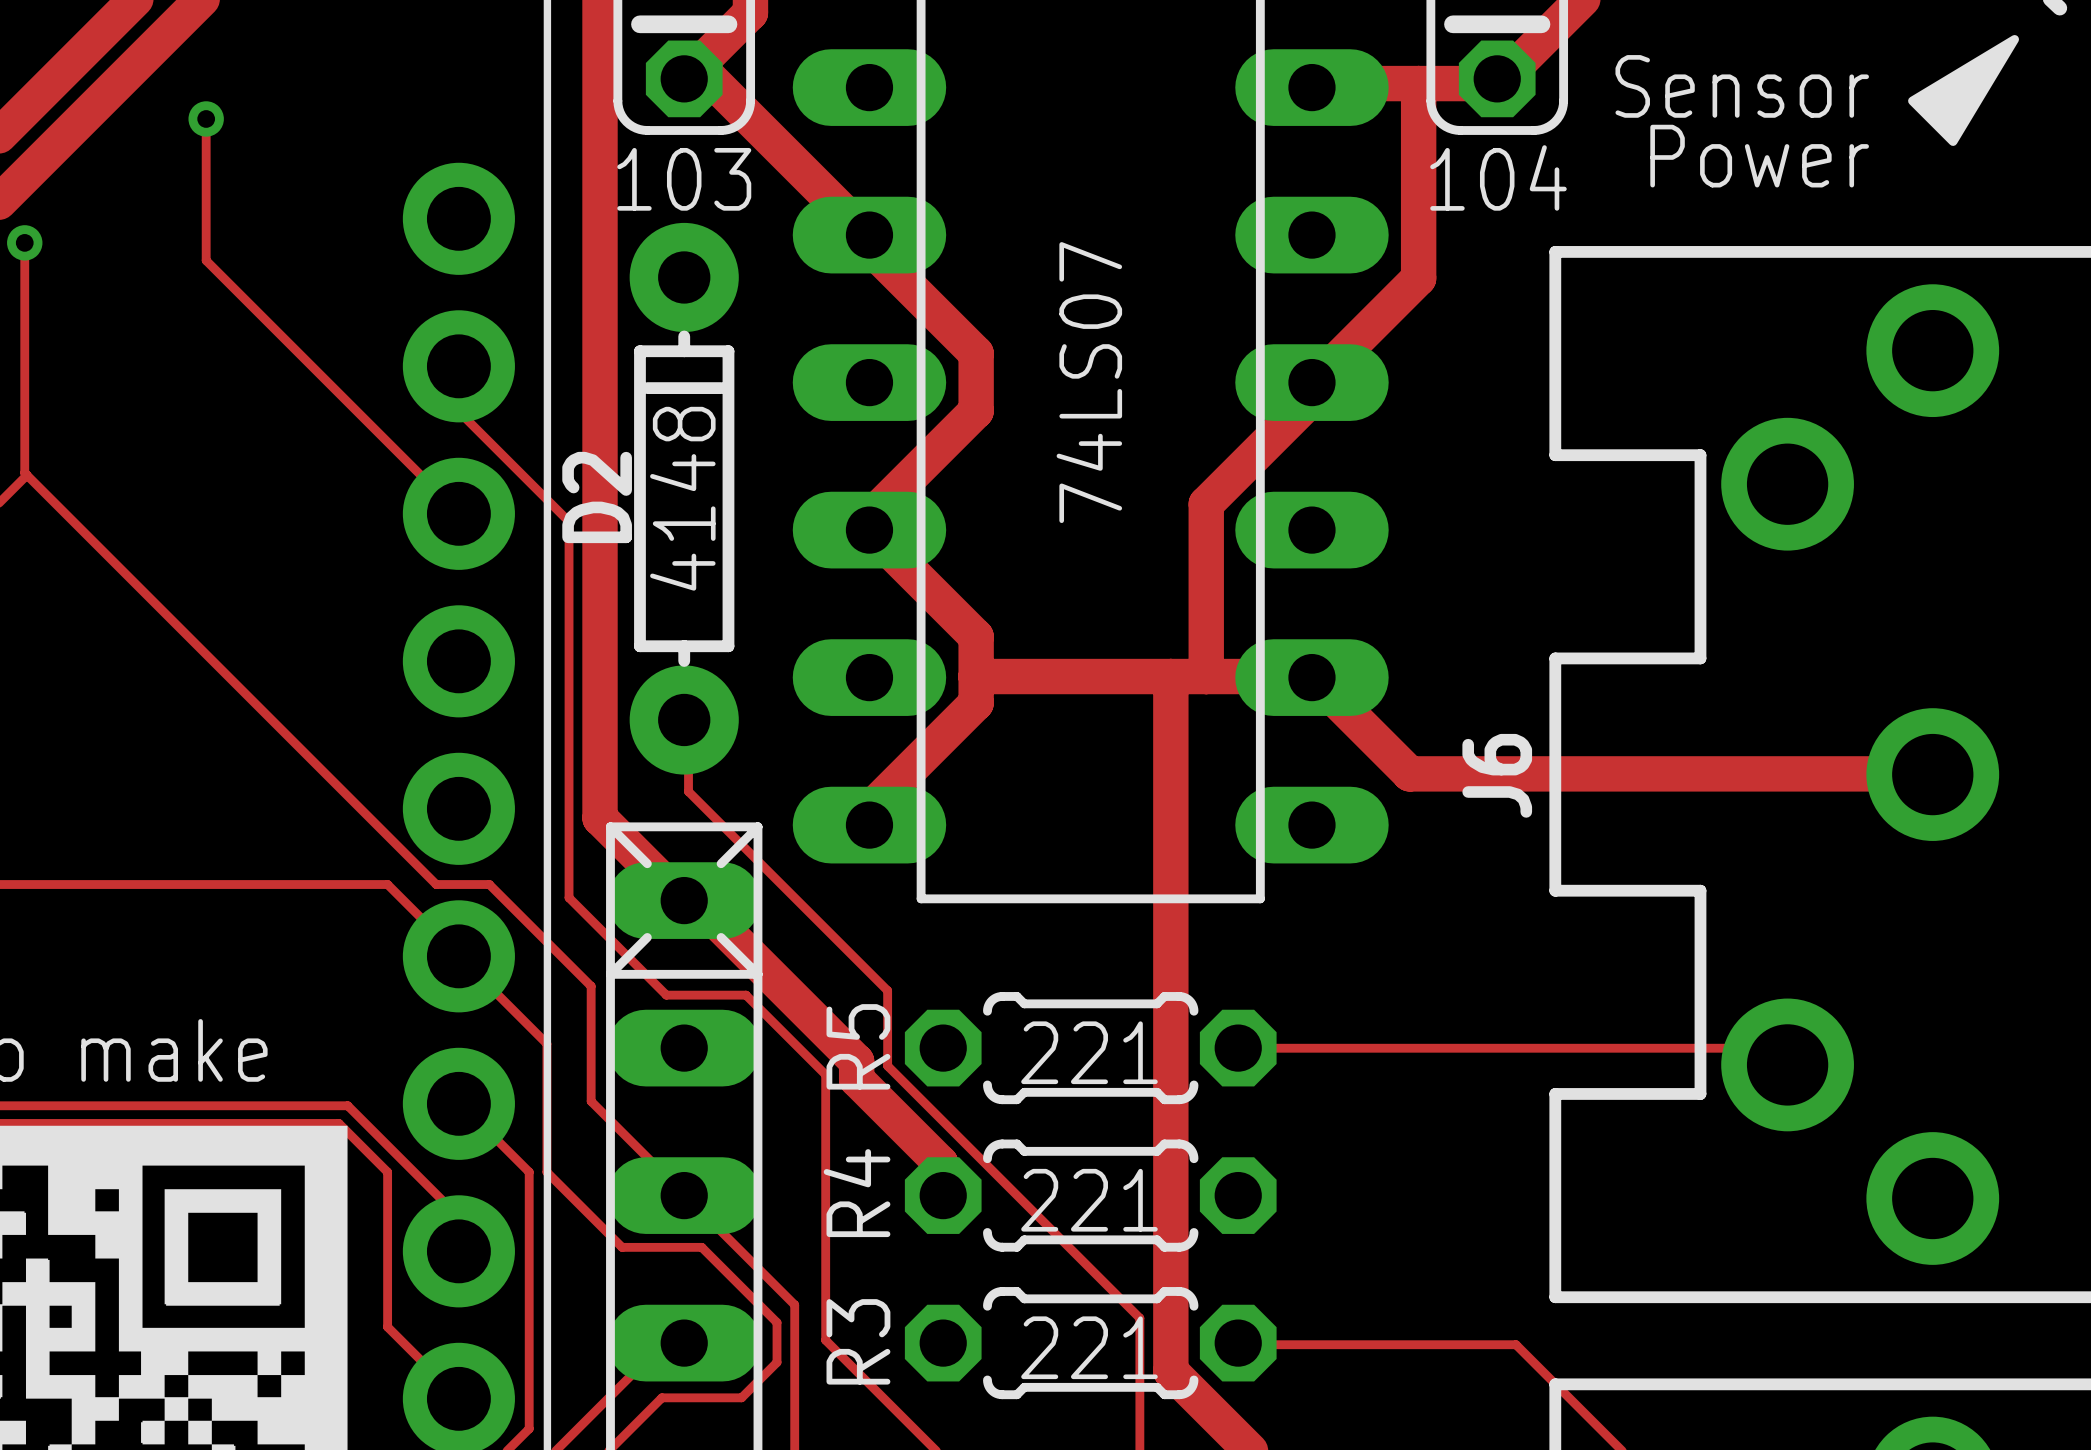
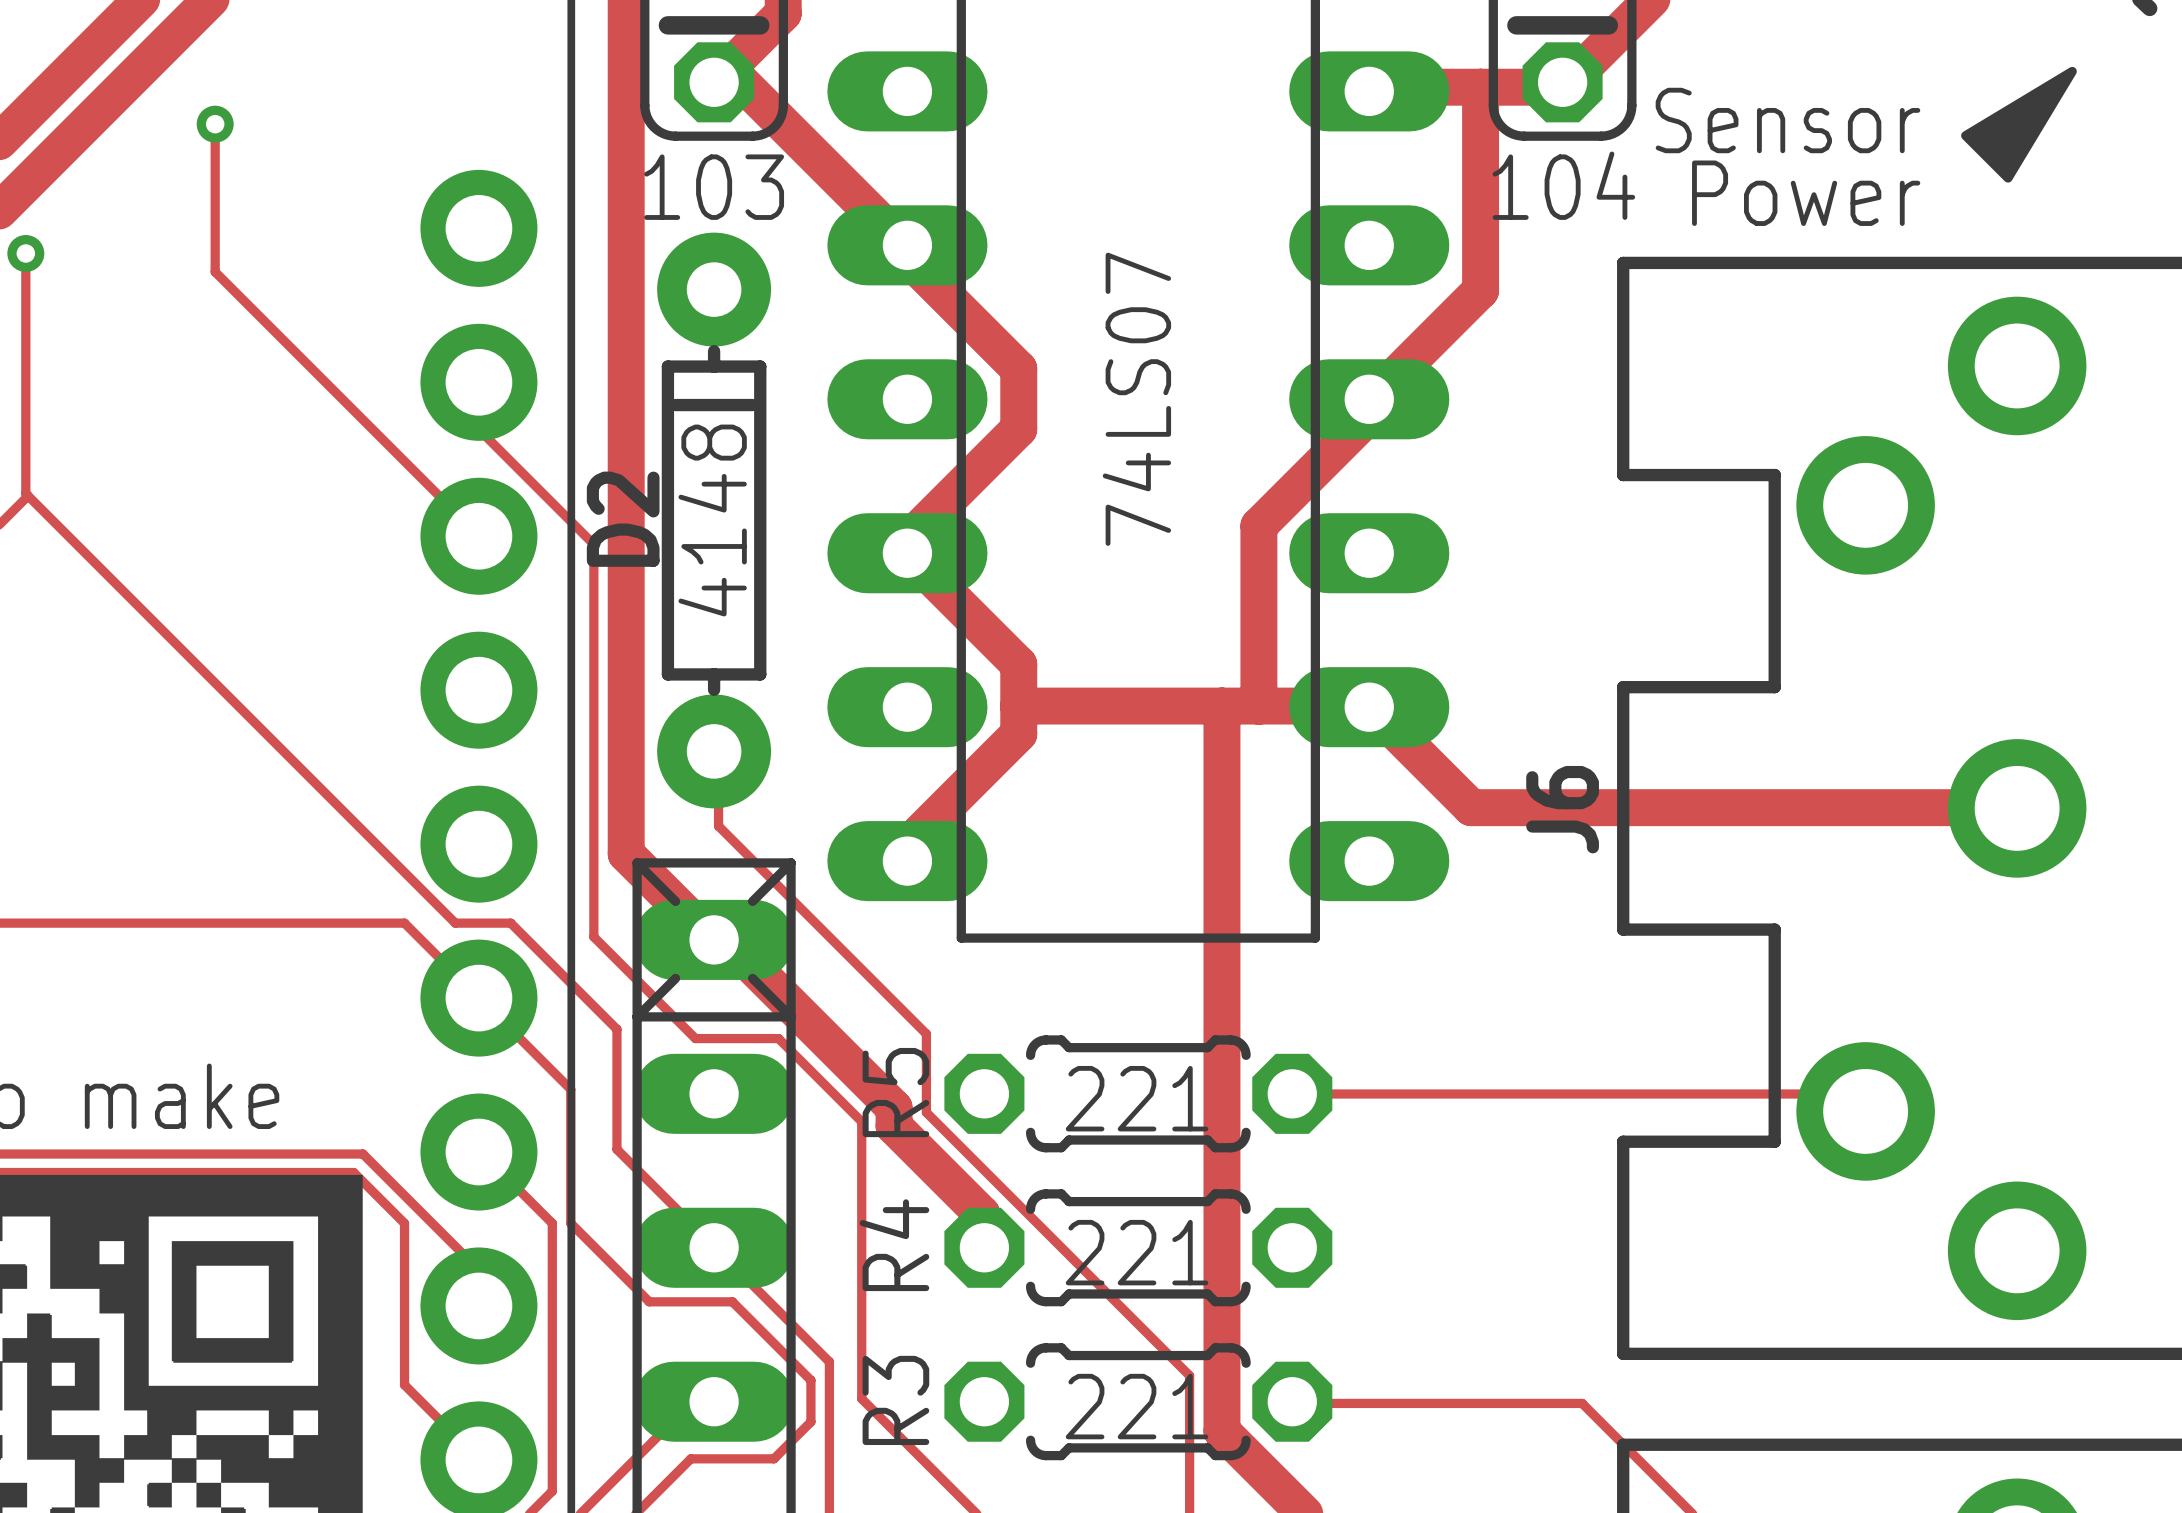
text position: Sensor (1742, 86) -> Sensor (1787, 120)
drawing position: (1963, 90) -> (2018, 124)
text position: Power (1759, 156) -> Power (1806, 193)

